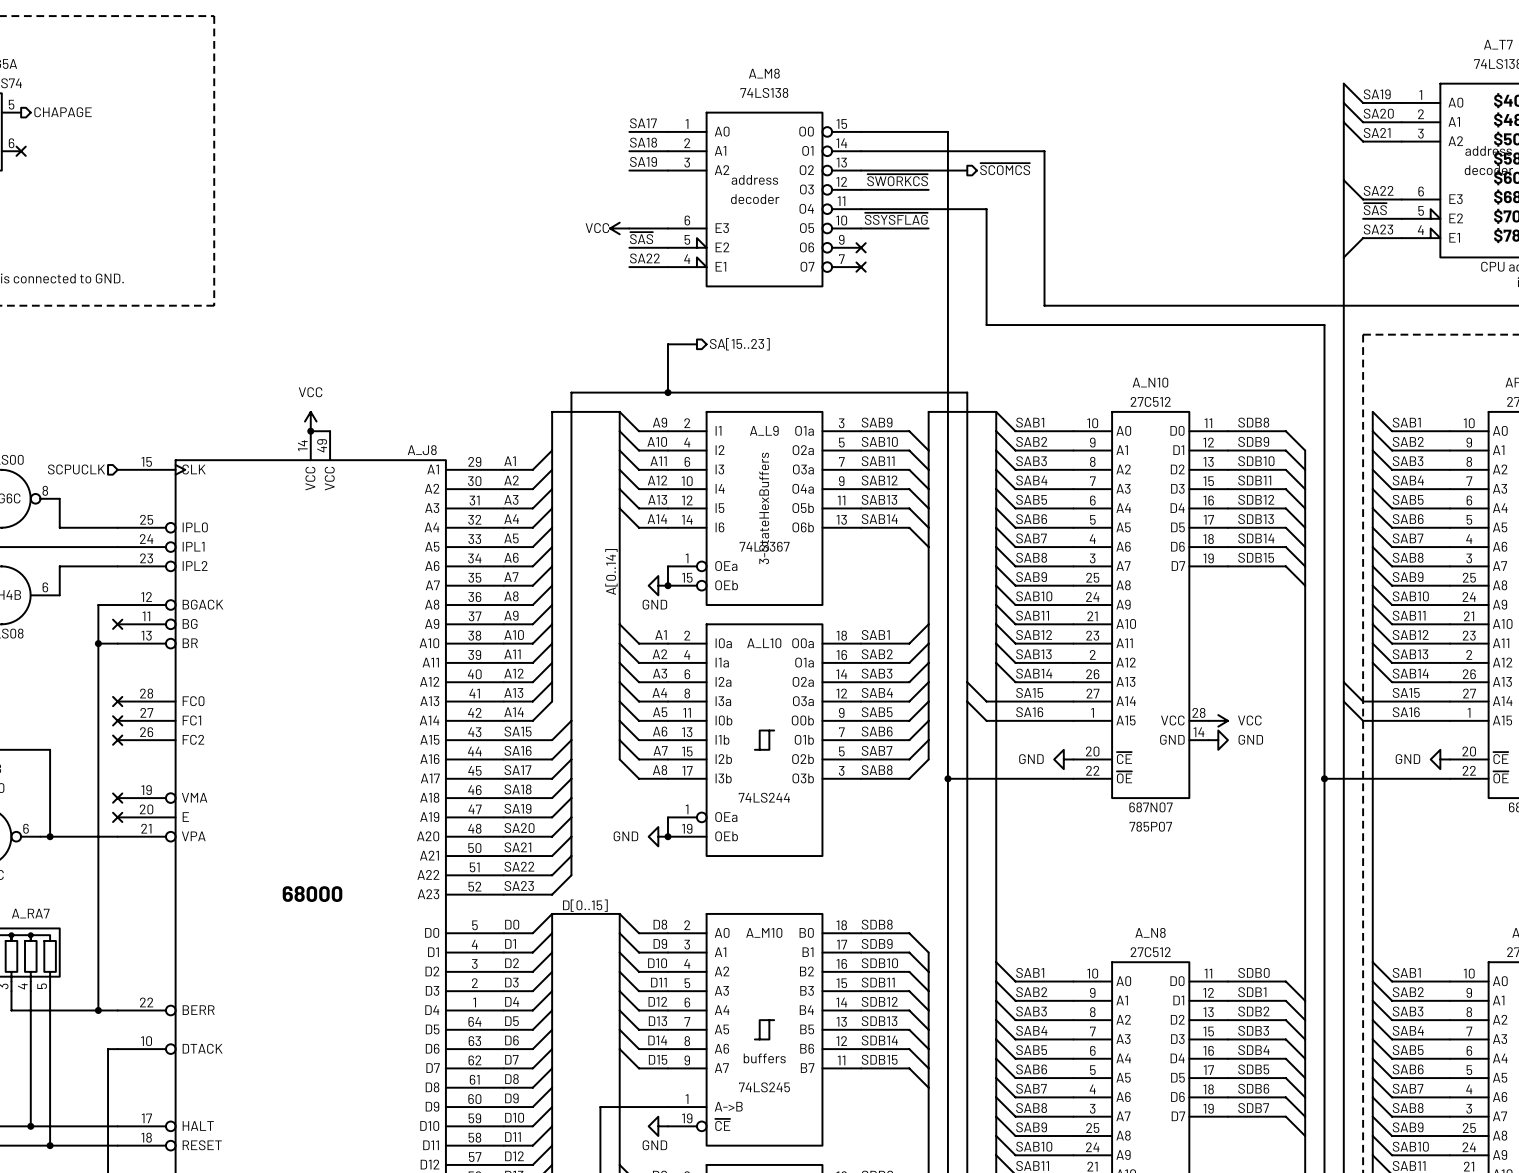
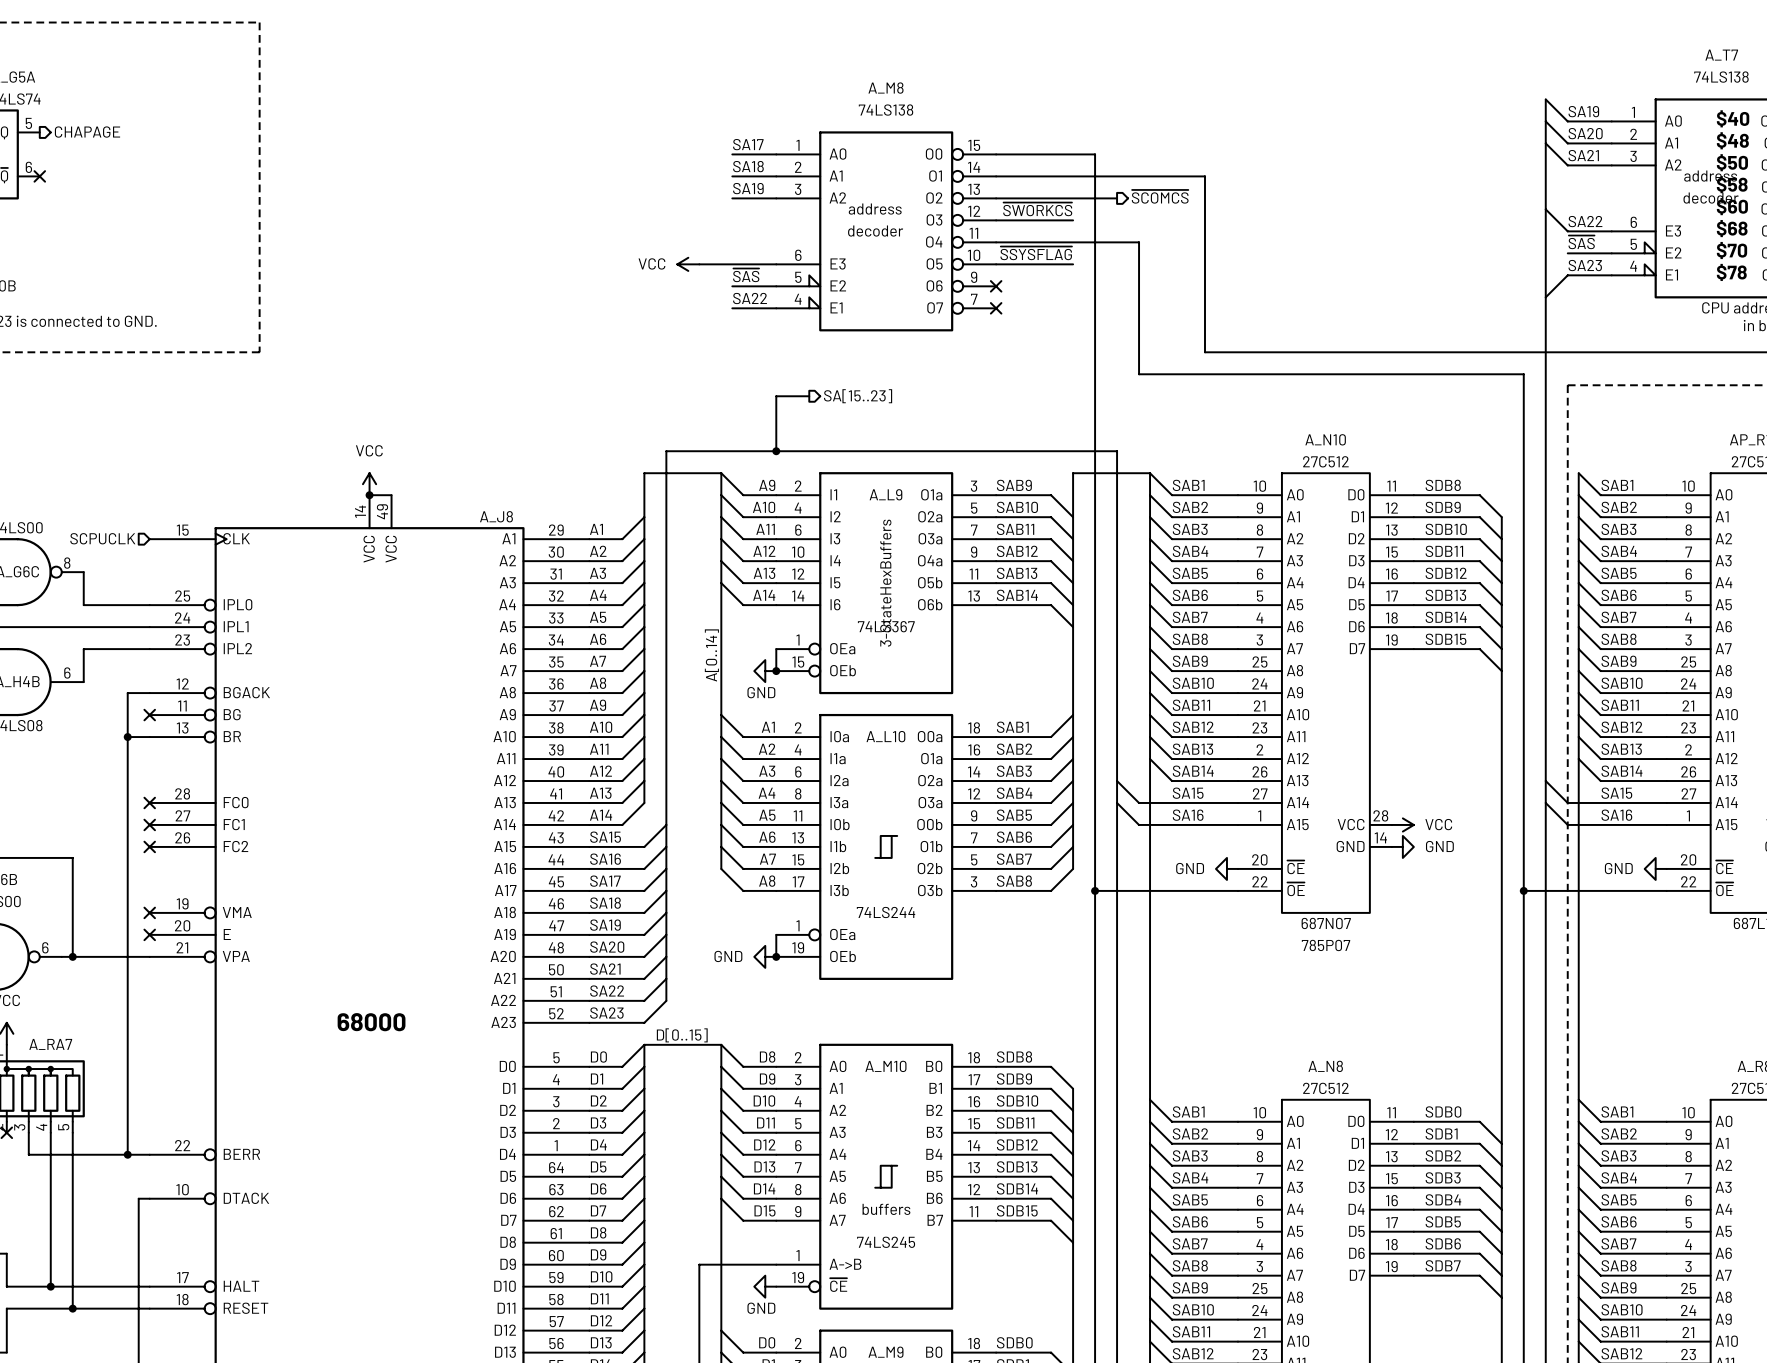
power symbol text position: VCC (597, 228) -> VCC (651, 263)
power symbol position: VCC (619, 228) -> VCC (688, 264)

